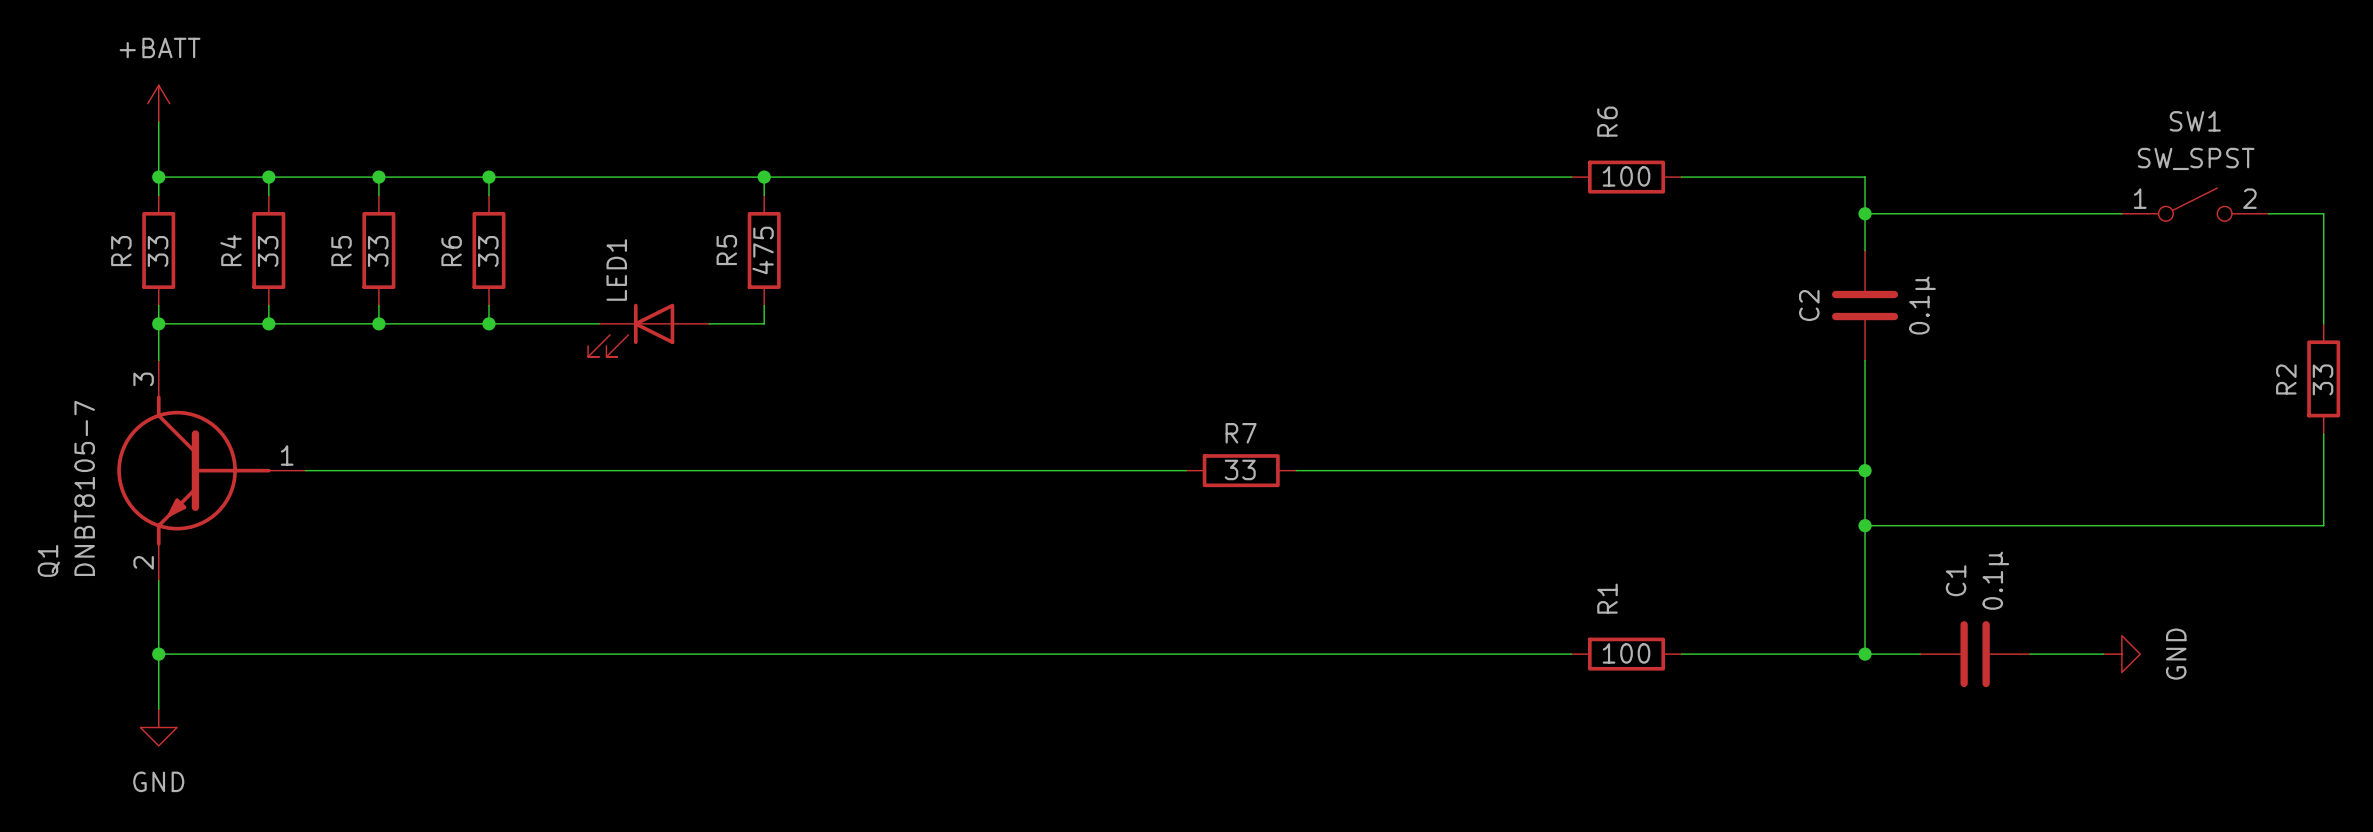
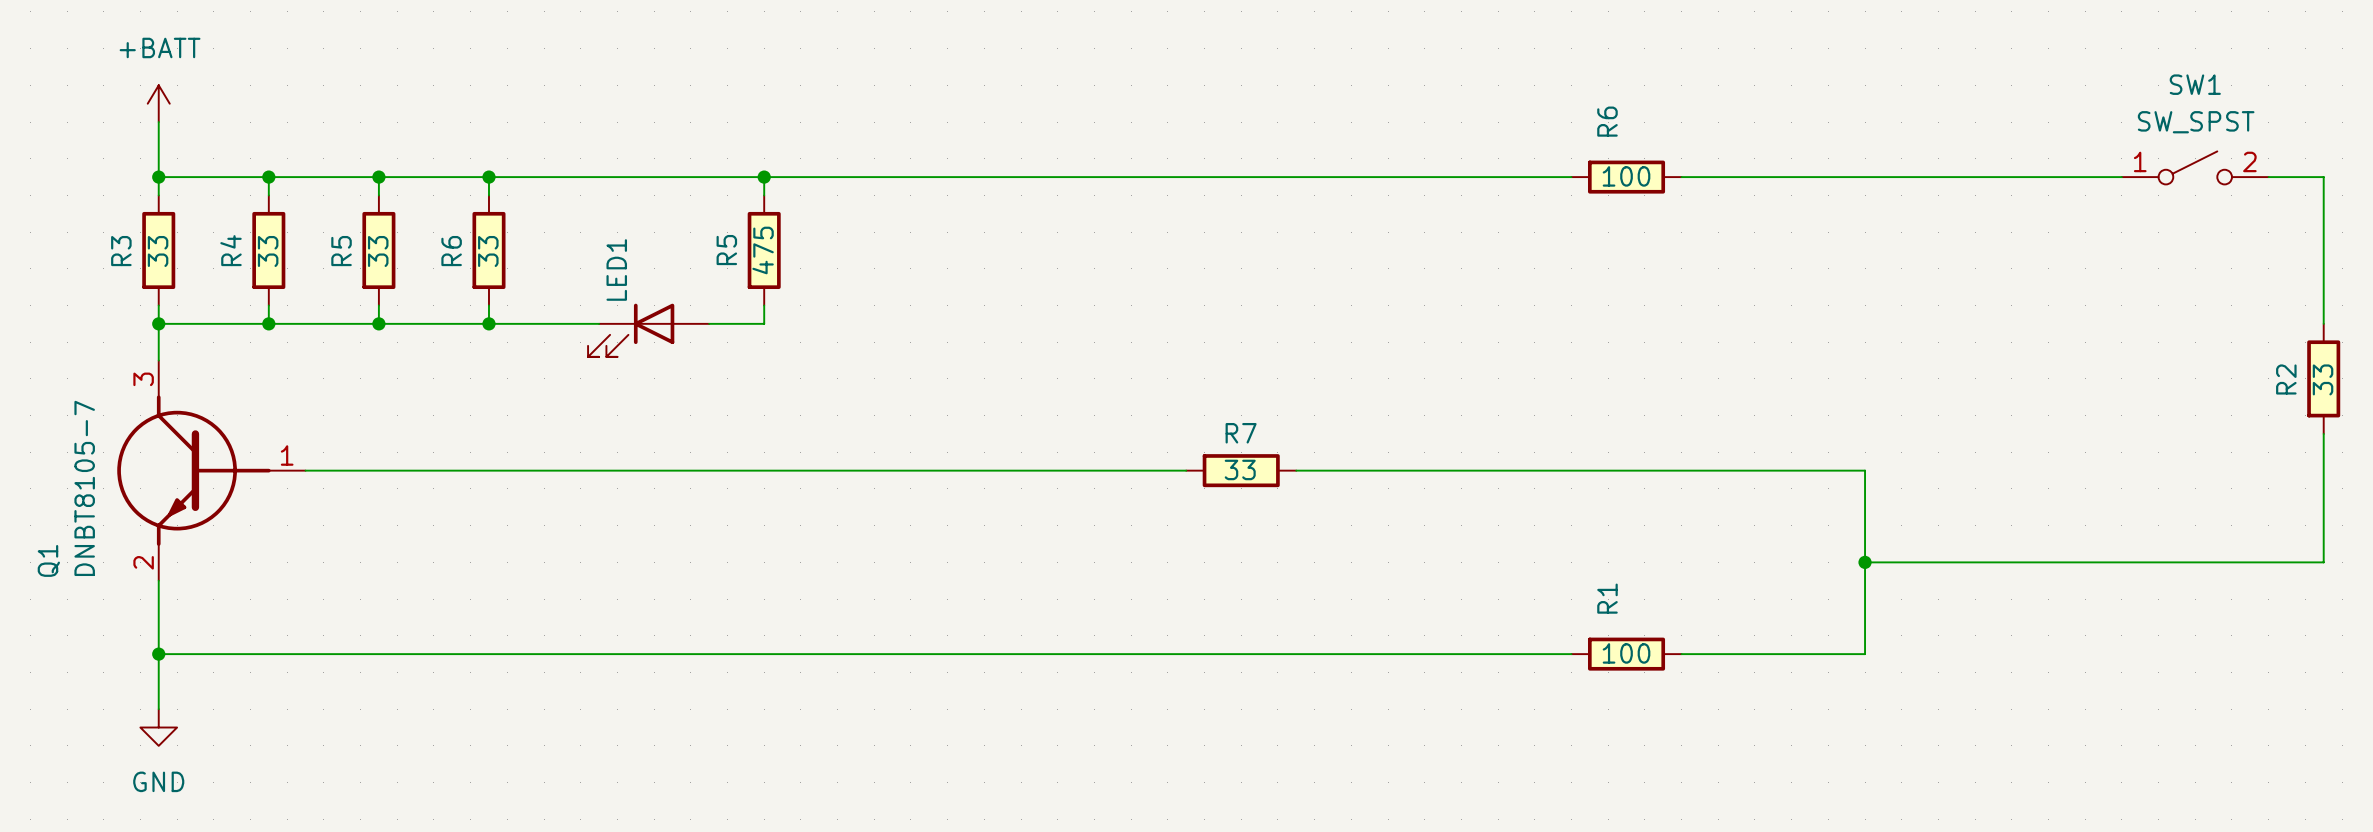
wire: (1865, 177) (1865, 250) -> (1865, 177) (2121, 177)
SW1 position: (2195, 204) -> (2195, 167)
wire: (1865, 213) (2121, 213) -> none
junction: (1865, 213) -> none
wire: (2268, 213) (2323, 213) -> (2268, 177) (2323, 177) (2323, 213)
C2: 0.1µ (1865, 305) -> none
wire: (1865, 360) (1865, 470) -> none
junction: (1865, 470) -> none
wire: (1865, 525) (2323, 525) -> (1865, 562) (2323, 562) (2323, 525)
junction position: (1865, 525) -> (1865, 562)
wire: (1865, 654) (1920, 654) -> none
junction: (1865, 654) -> none
C1: 0.1µ (1975, 654) -> none
wire: (2030, 654) (2103, 654) -> none
power symbol: GND (2121, 654) -> none

